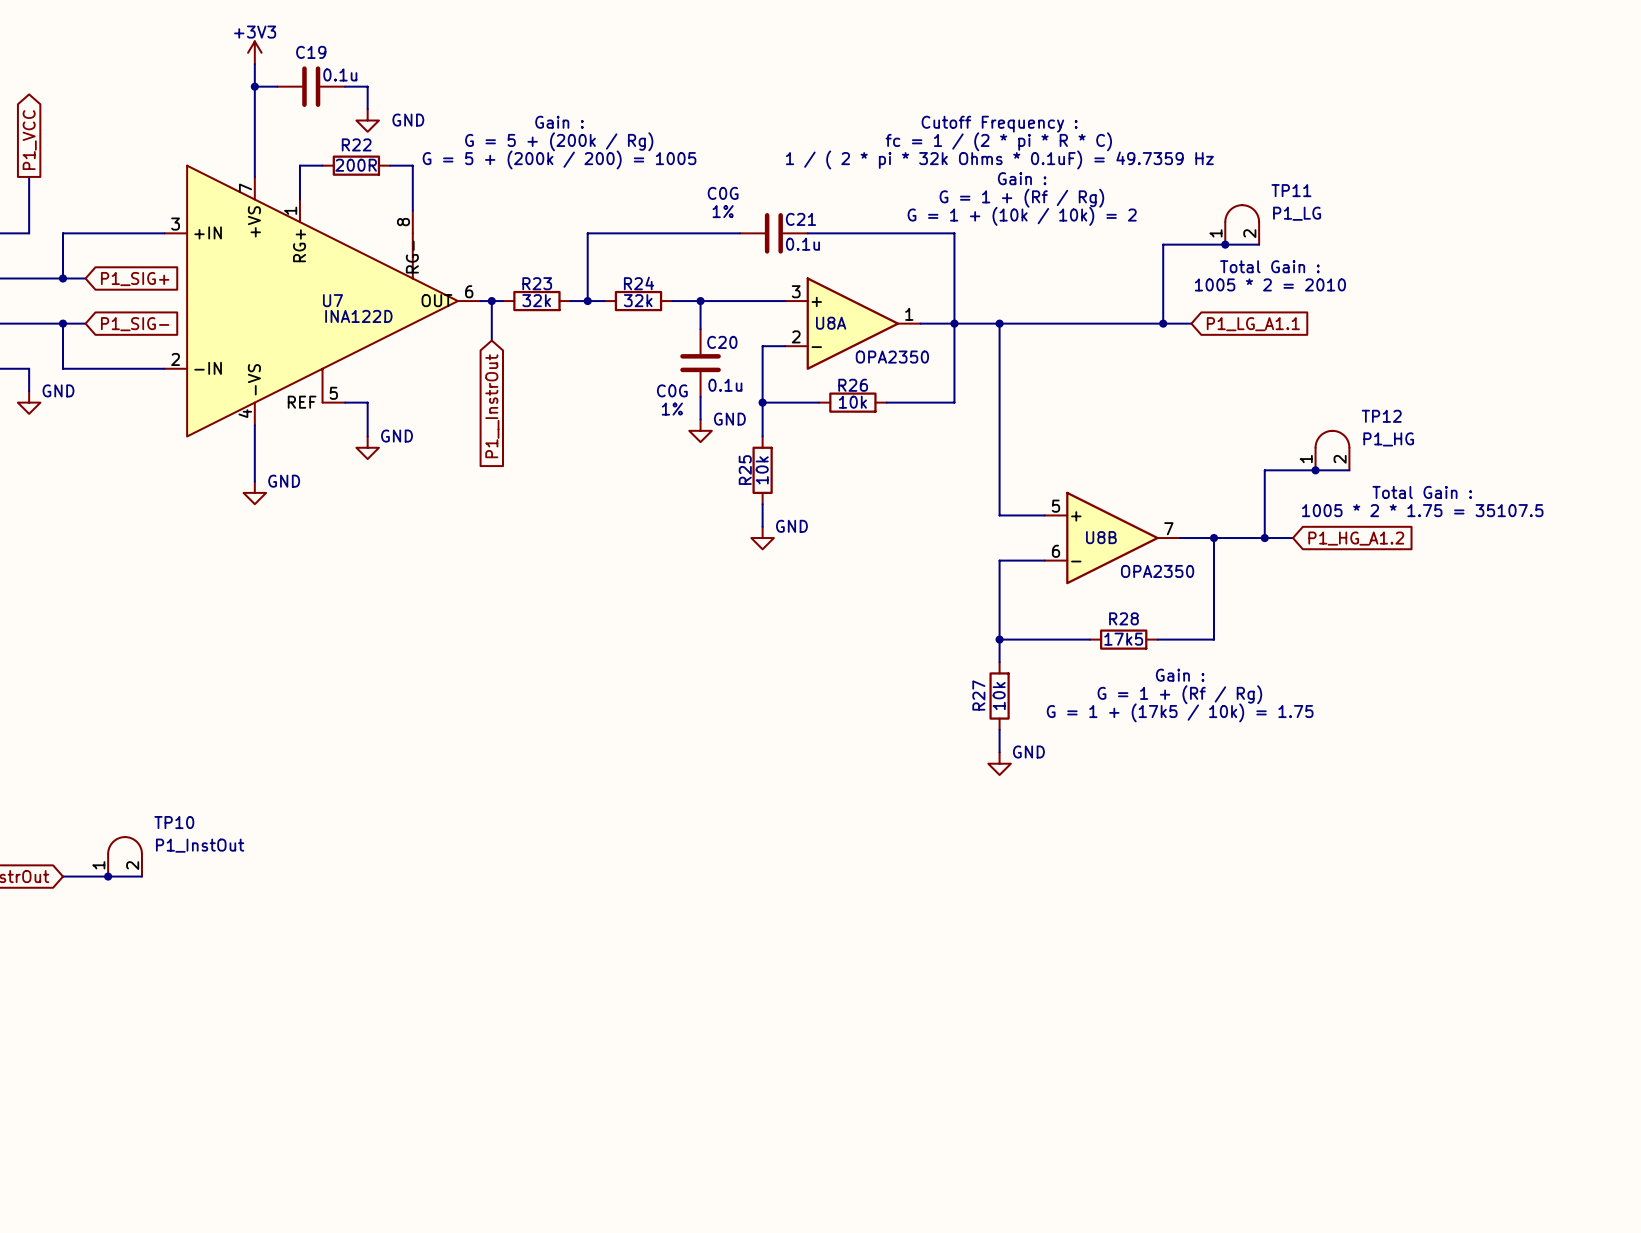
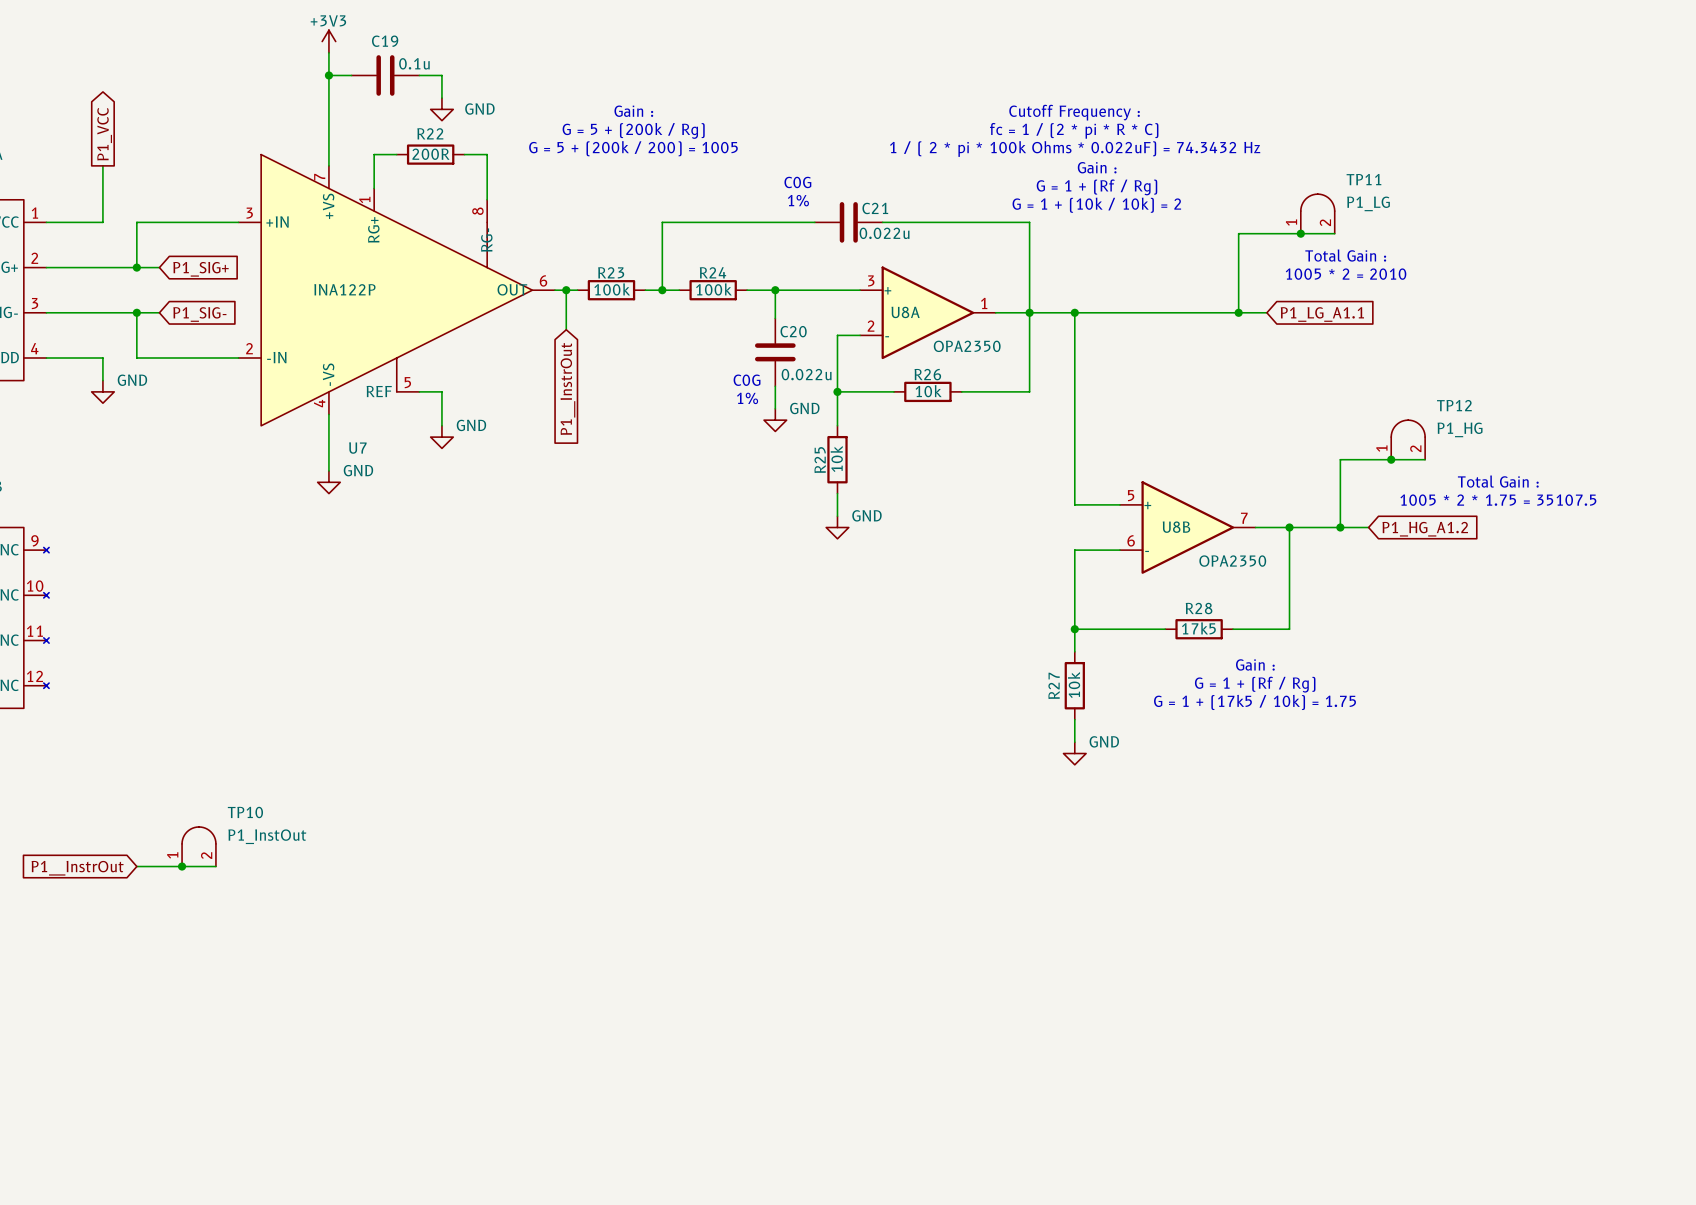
text: 1 / ( 2 * pi * 32k Ohms * 0.1uF) = 49.7359 Hz (999, 159) -> 1 / ( 2 * pi * 100k Ohms * 0.022uF) = 74.3432 Hz (1075, 149)
C21 value: 0.1u (802, 244) -> 0.022u (884, 233)
U7 name position: U7 (332, 300) -> U7 (357, 448)
R23 value: 32k (536, 300) -> 100k (612, 289)
R24 value: 32k (638, 300) -> 100k (713, 289)
U7 value: INA122D (358, 316) -> INA122P (344, 289)
C20 value: 0.1u (725, 385) -> 0.022u (806, 374)

